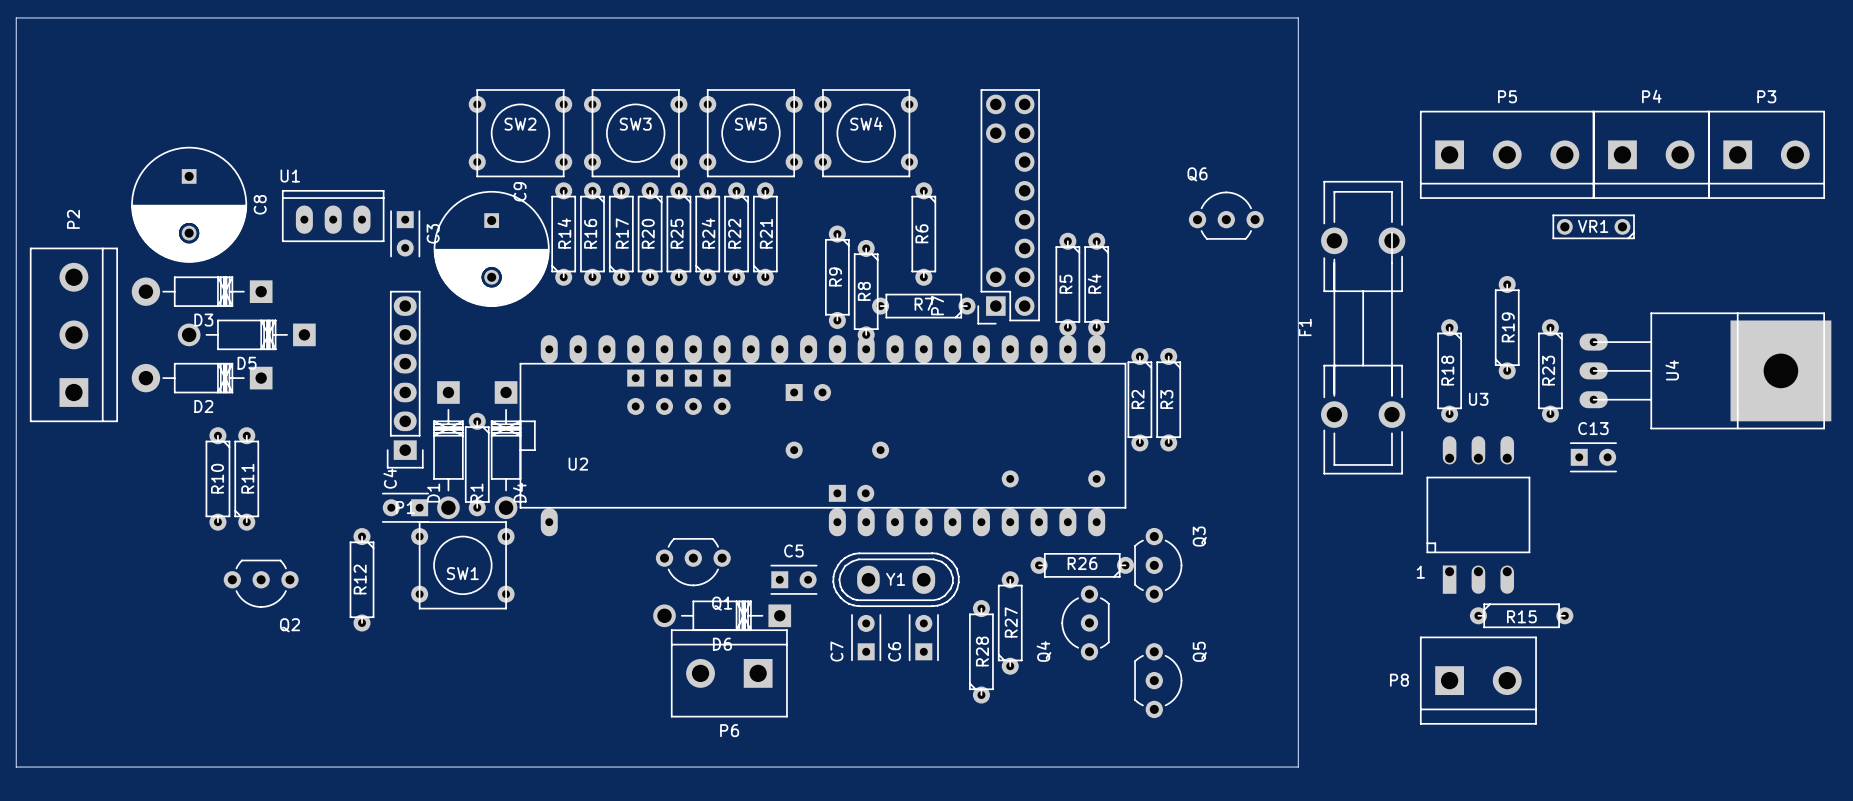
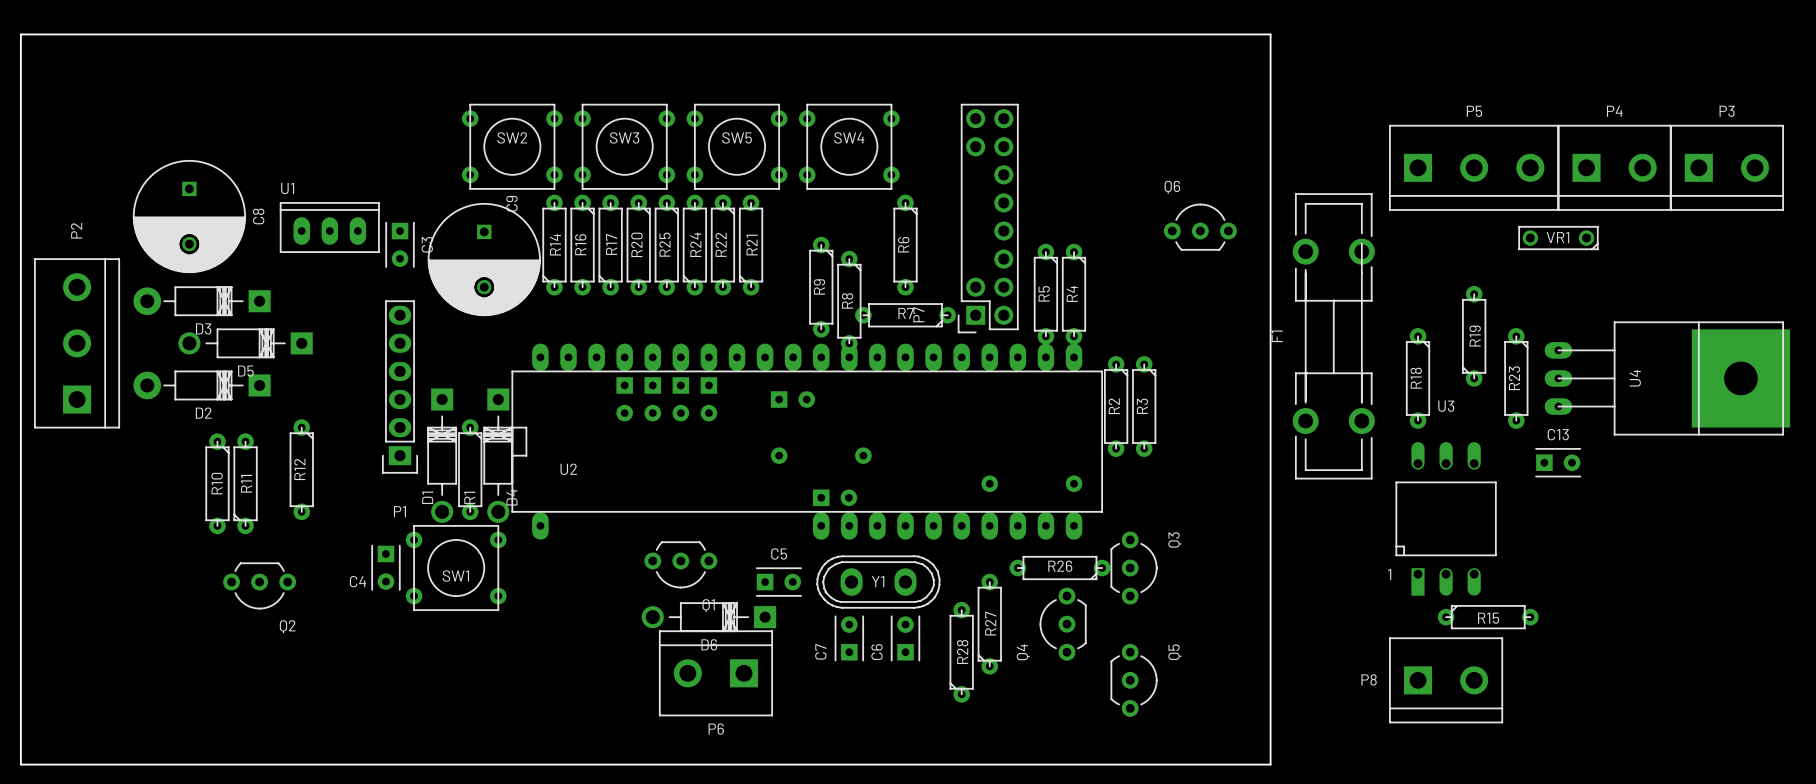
C4 rotation: 0° (405, 507) -> 90° counterclockwise (385, 567)
C4 position: (405, 507) -> (385, 567)
R12 position: (362, 579) -> (301, 469)

